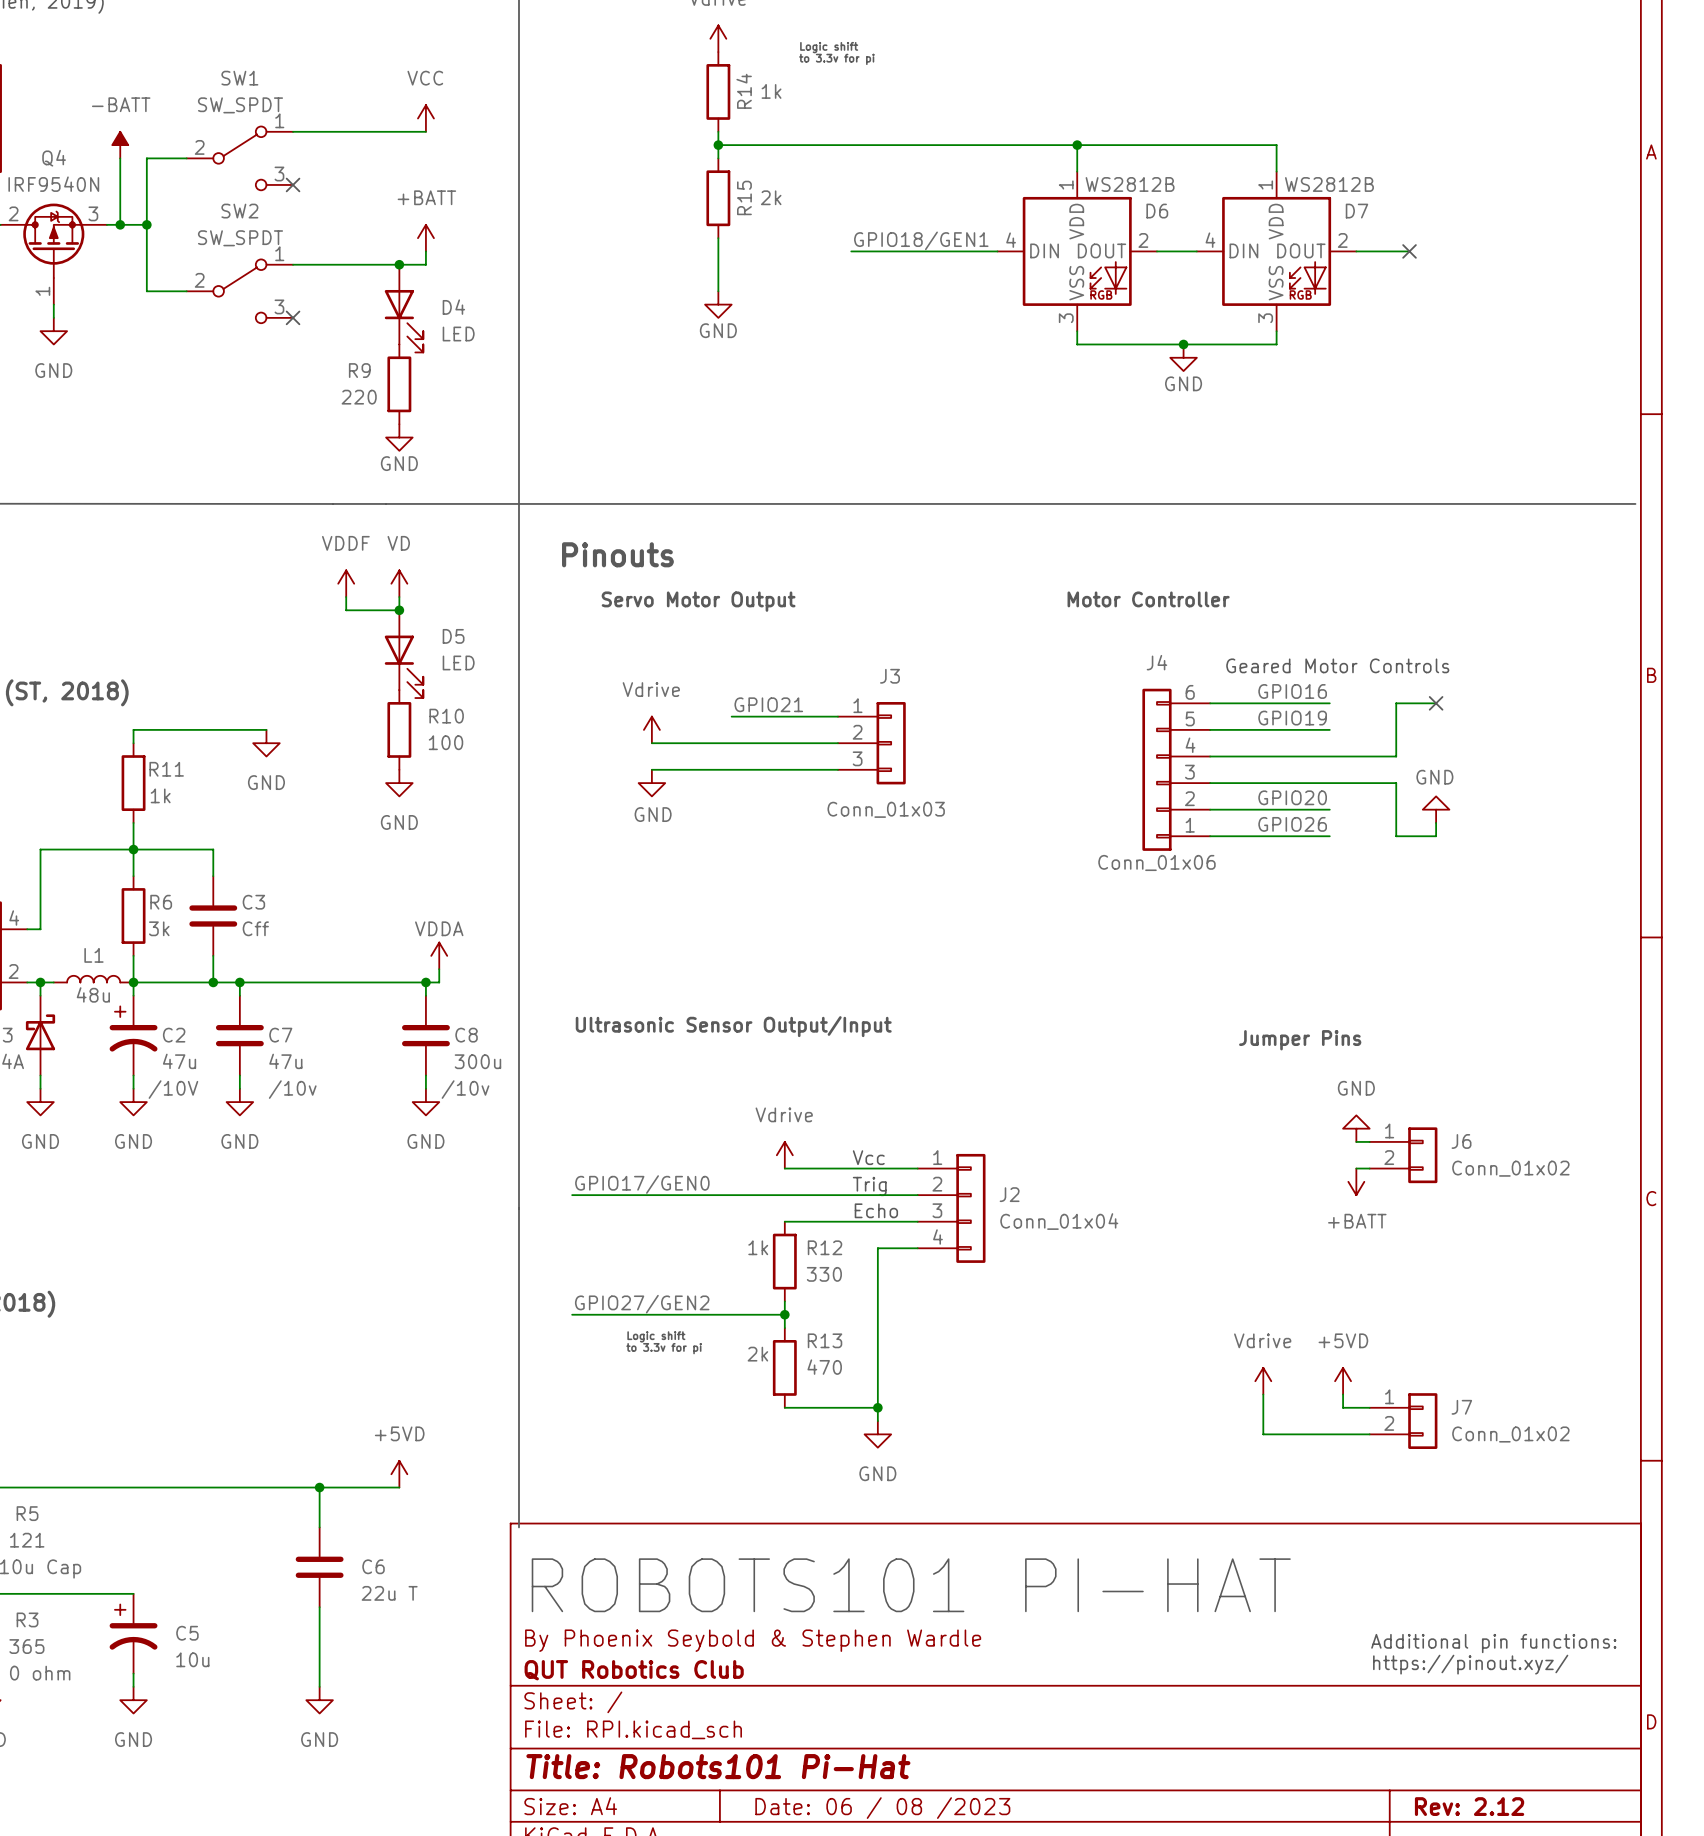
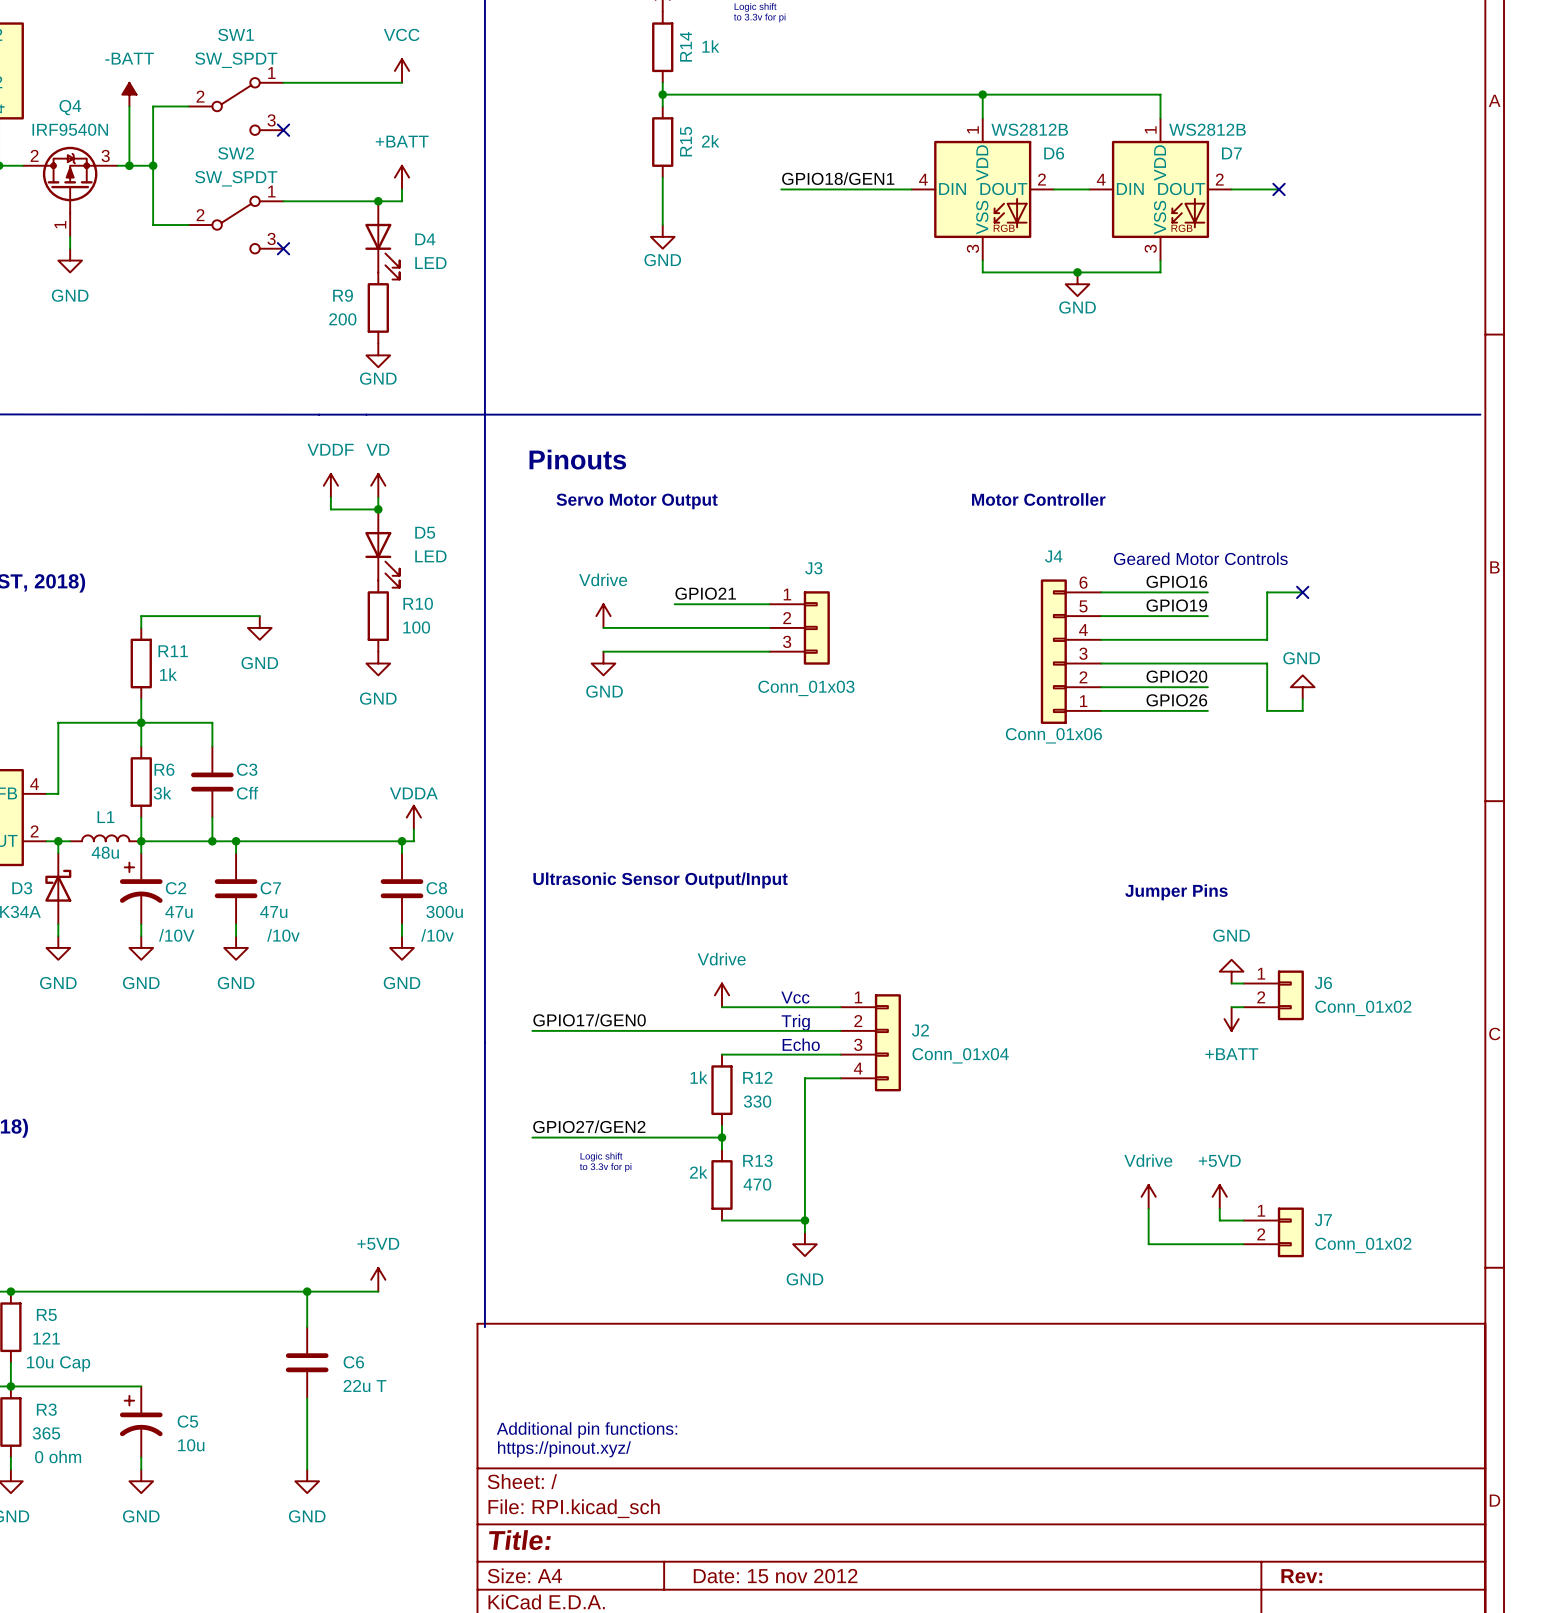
R9 value: 220 (359, 397) -> 200 (342, 319)
text: ROBOTS101 PI-HAT (911, 1585) -> none
title block: By Phoenix Seybold & Stephen Wardle (753, 1640) -> none
text: none -> Additional pin functions: (587, 1430)
text: Additional pin functions: (1493, 1643) -> none
text: none -> https://pinout.xyz/ (564, 1449)
text: https://pinout.xyz/ (1470, 1664) -> none
title block: QUT Robotics Club (634, 1670) -> none
title block: Title: Robots101 Pi-Hat (718, 1766) -> Title: (519, 1540)
title block: Rev: 2.12 (1469, 1806) -> Rev: (1301, 1576)
title block: Date: 06 / 08 /2023 (882, 1808) -> Date: 15 nov 2012 (775, 1576)

